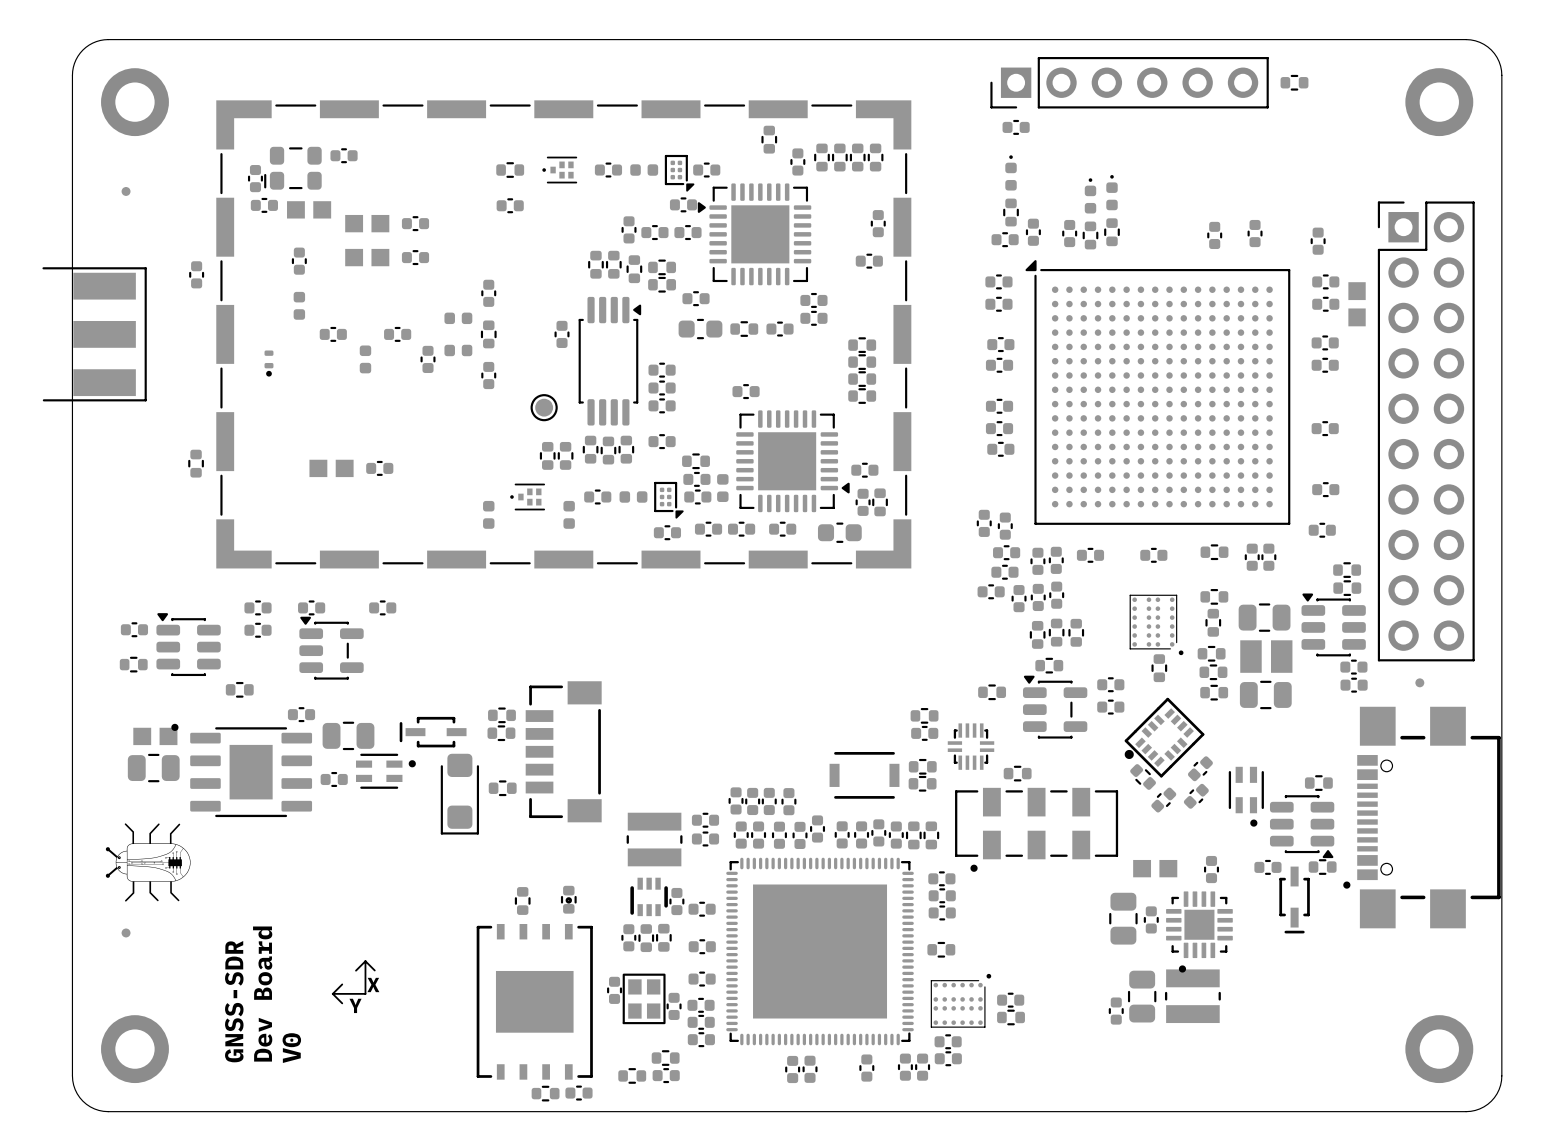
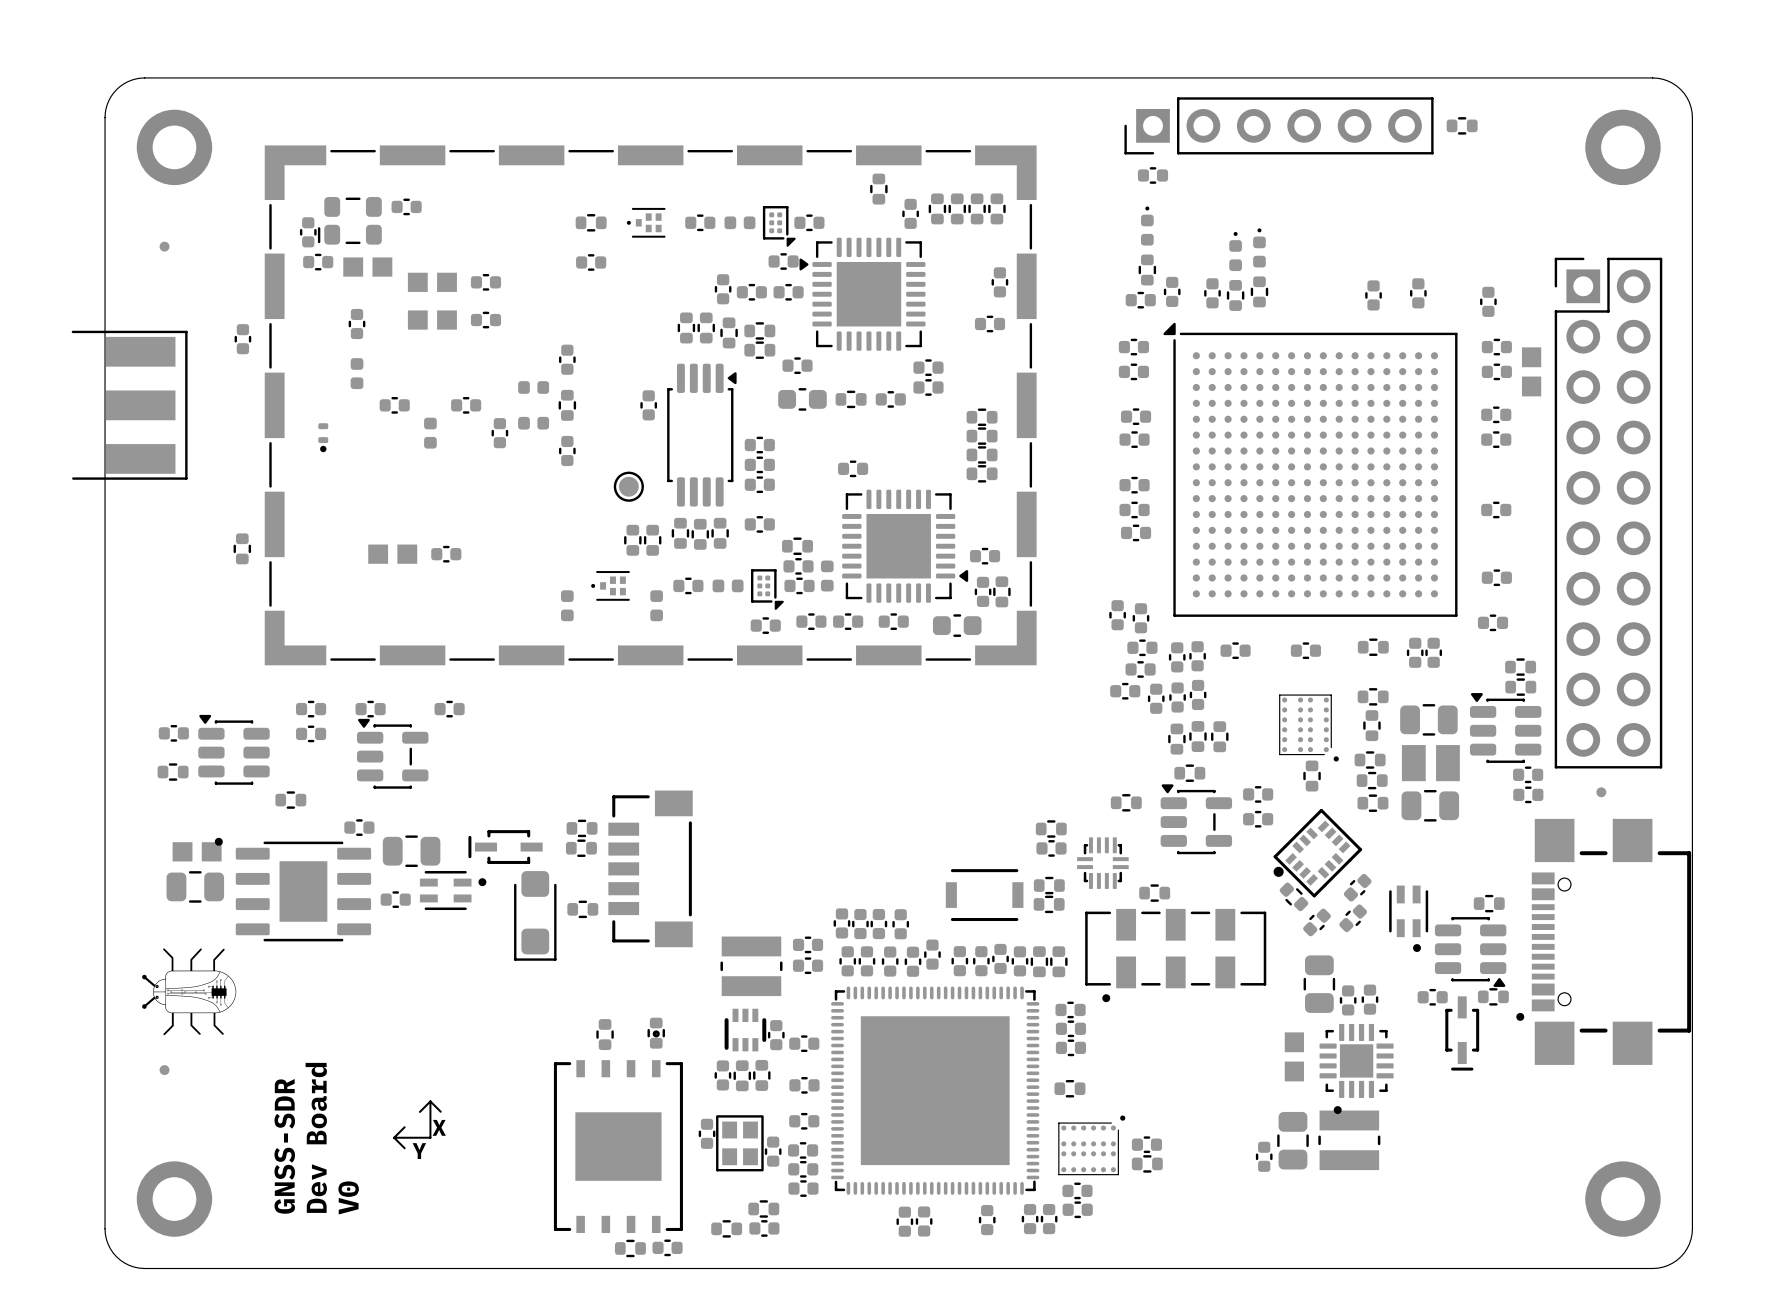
part footprint: [1133, 859, 1178, 878] -> [1303, 955, 1336, 1013]
part: none -> (1348, 1000)
part footprint: [1143, 906, 1159, 934] -> [1284, 1032, 1305, 1082]
part: (1123, 918) -> none

